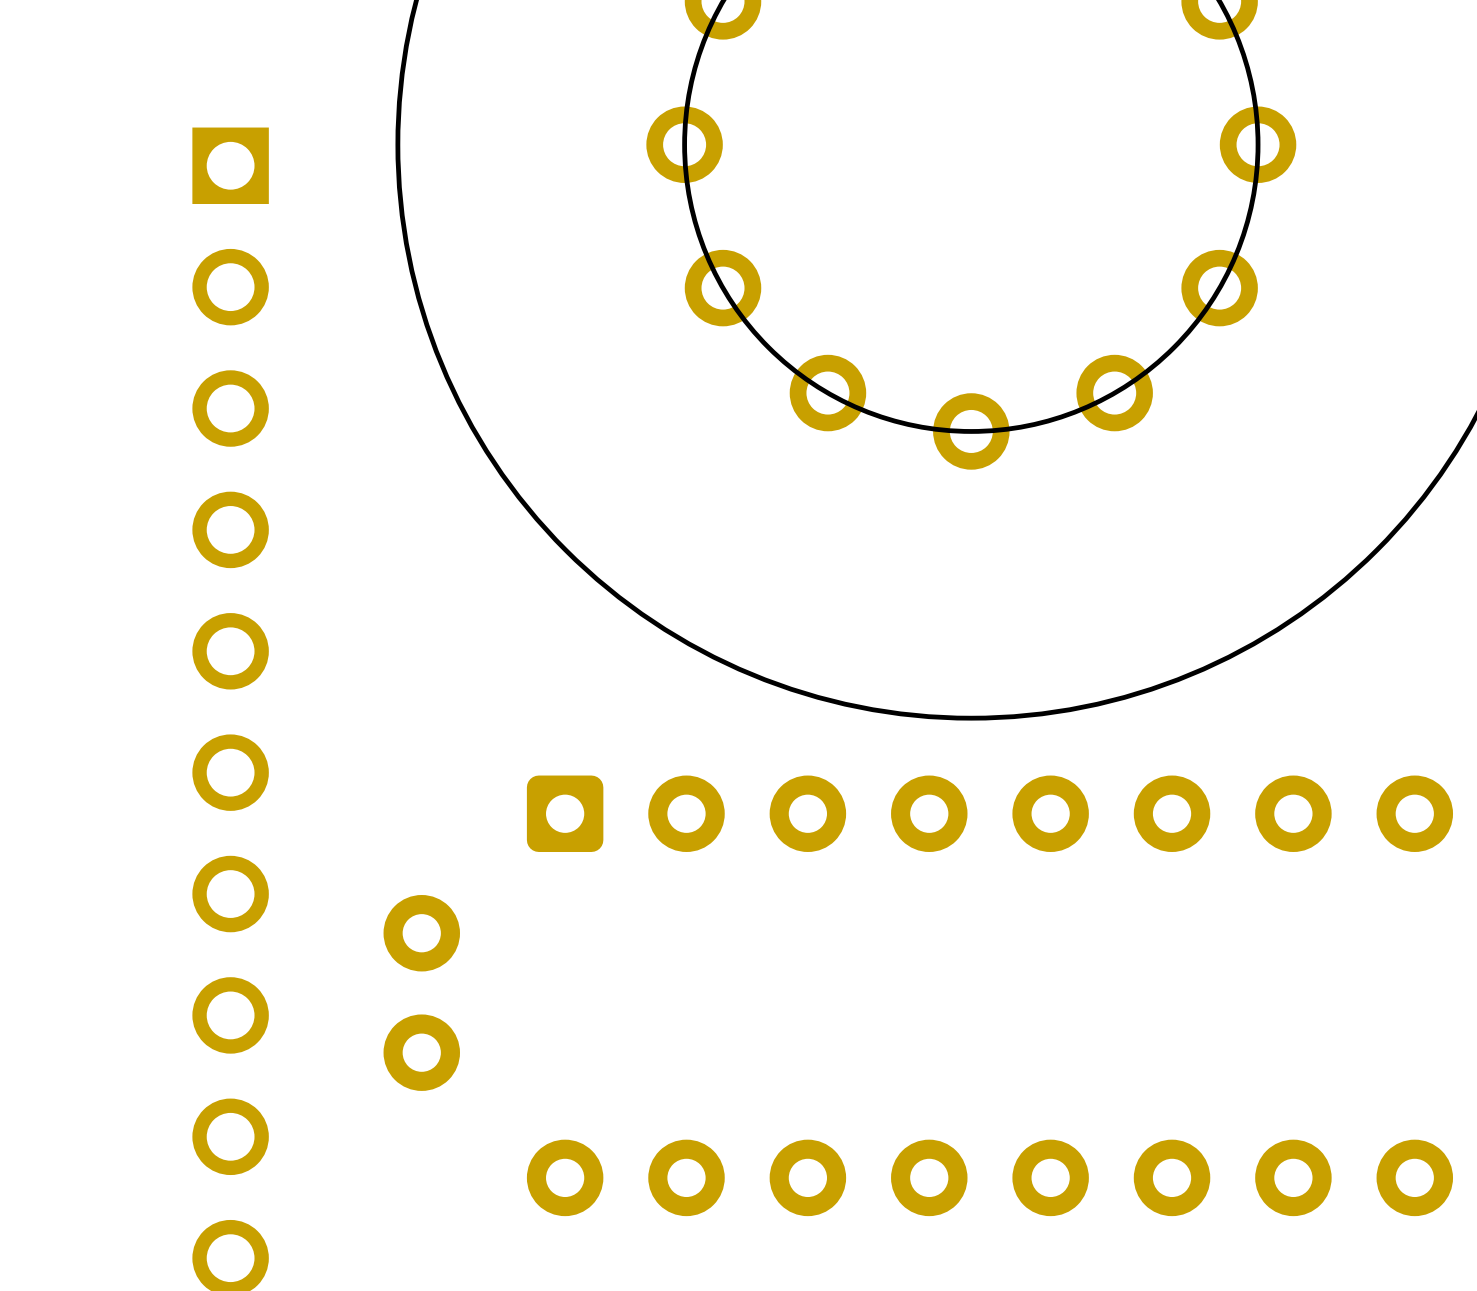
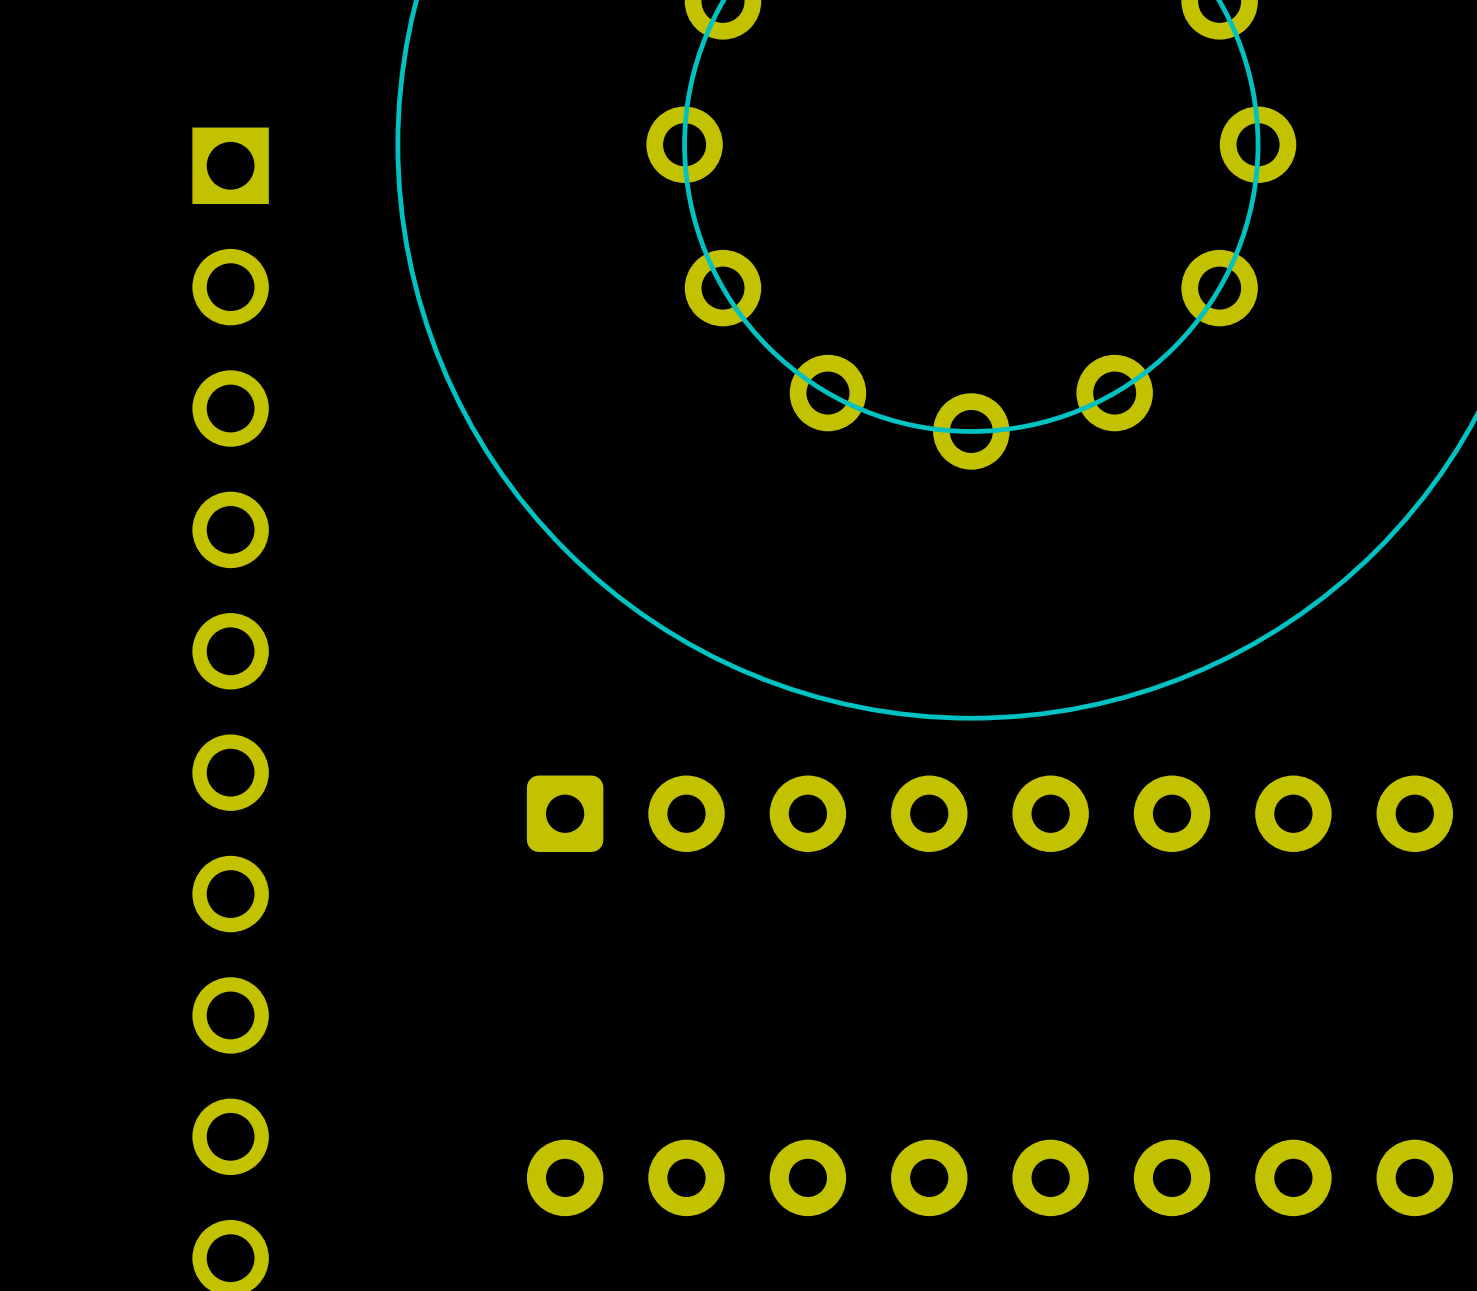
part: (421, 992) -> none

